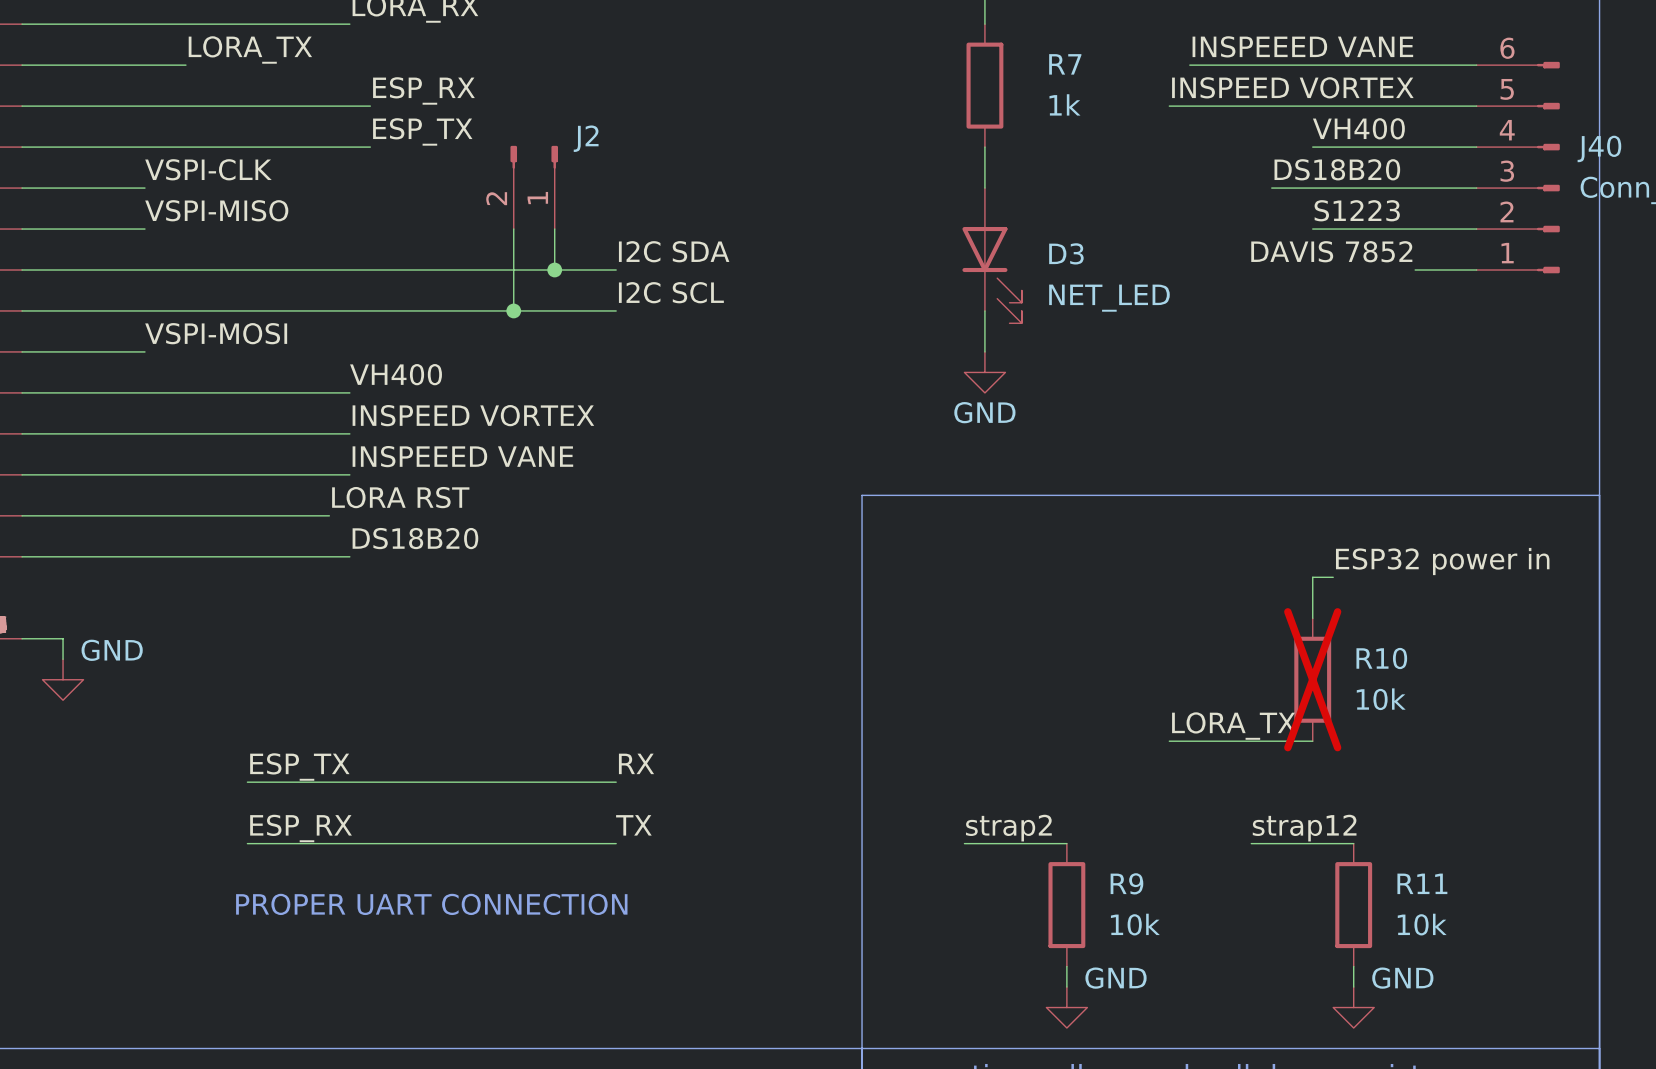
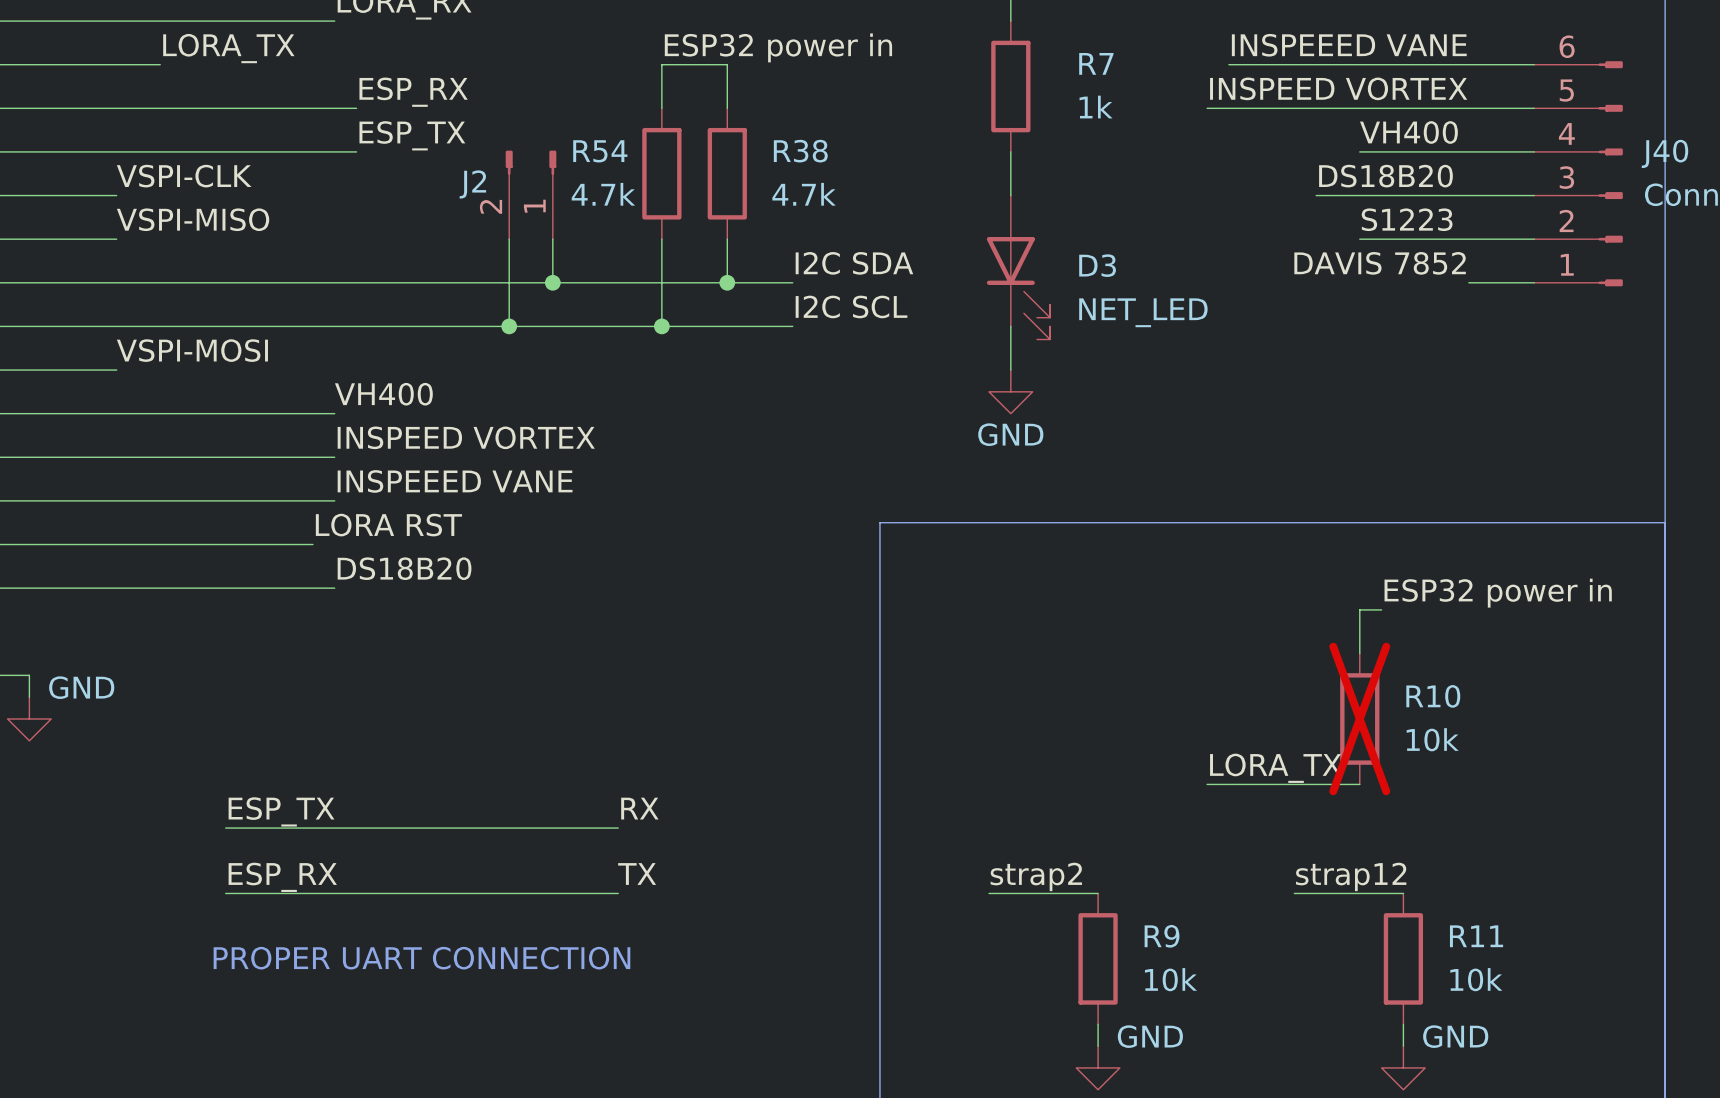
label: none -> ESP32 power in (778, 47)
wire: none -> (661, 108) (661, 64) (727, 64) (727, 108)
J2 name position: J2 (586, 138) -> J2 (472, 184)
R54: none -> 4.7k (661, 173)
R38: none -> 4.7k (727, 173)
wire: none -> (661, 239) (661, 326)
wire: none -> (727, 239) (727, 282)
label position: I2C SDA (674, 251) -> I2C SDA (854, 263)
wire: none -> (618, 282) (792, 282)
junction: none -> (727, 282)
label position: I2C SCL (671, 292) -> I2C SCL (851, 306)
wire: none -> (618, 326) (792, 326)
junction: none -> (661, 326)

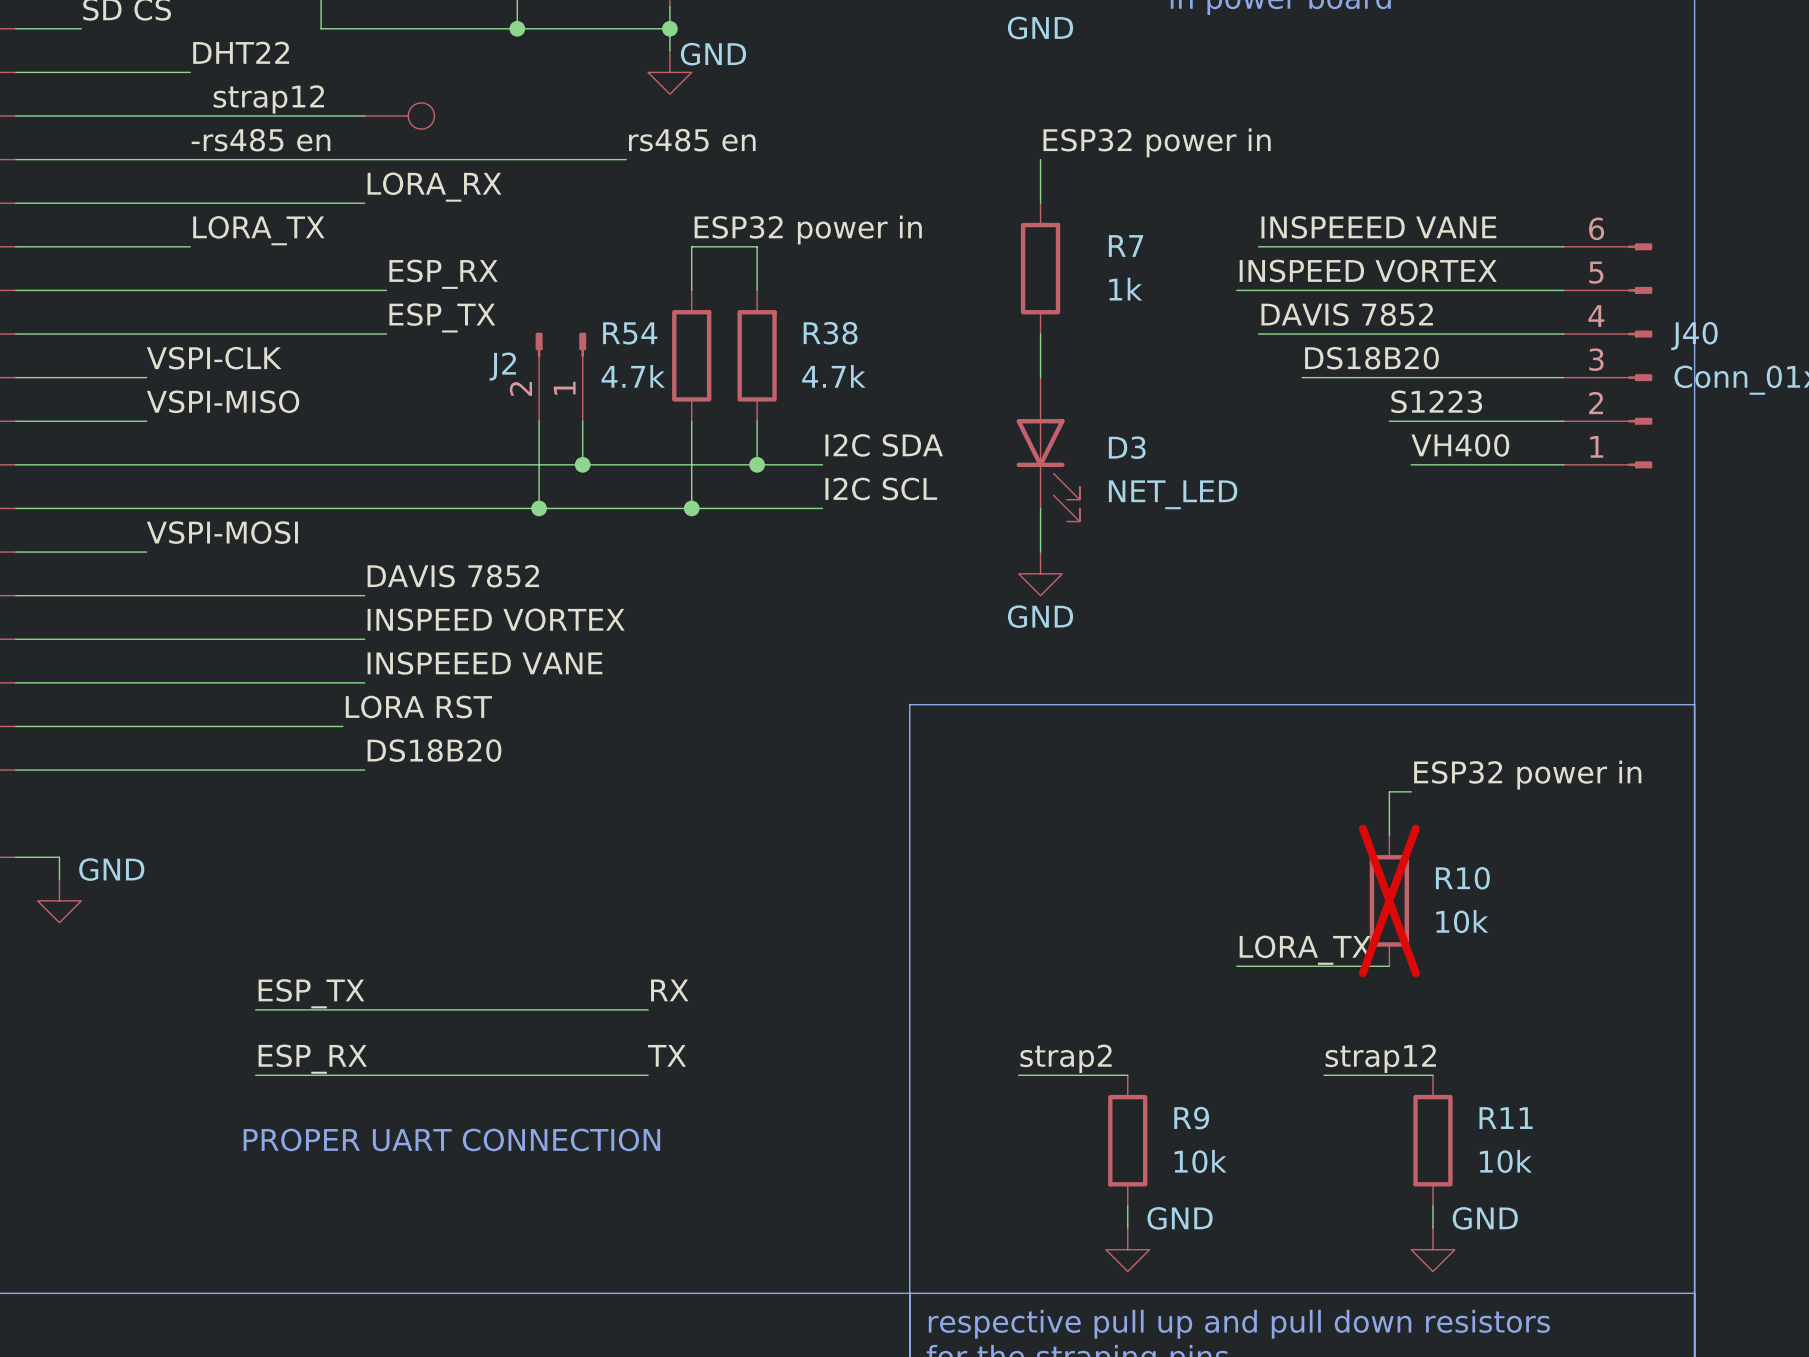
label position: VH400 (1408, 132) -> VH400 (1460, 445)
wire: none -> (1258, 334) (1389, 334)
label position: DS18B20 (1385, 176) -> DS18B20 (1371, 358)
wire: none -> (1302, 377) (1345, 377)
label position: DAVIS 7852 (1380, 263) -> DAVIS 7852 (1347, 314)
wire: none -> (1411, 464) (1498, 464)
label: VH400 (383, 394) -> DAVIS 7852 (453, 576)

